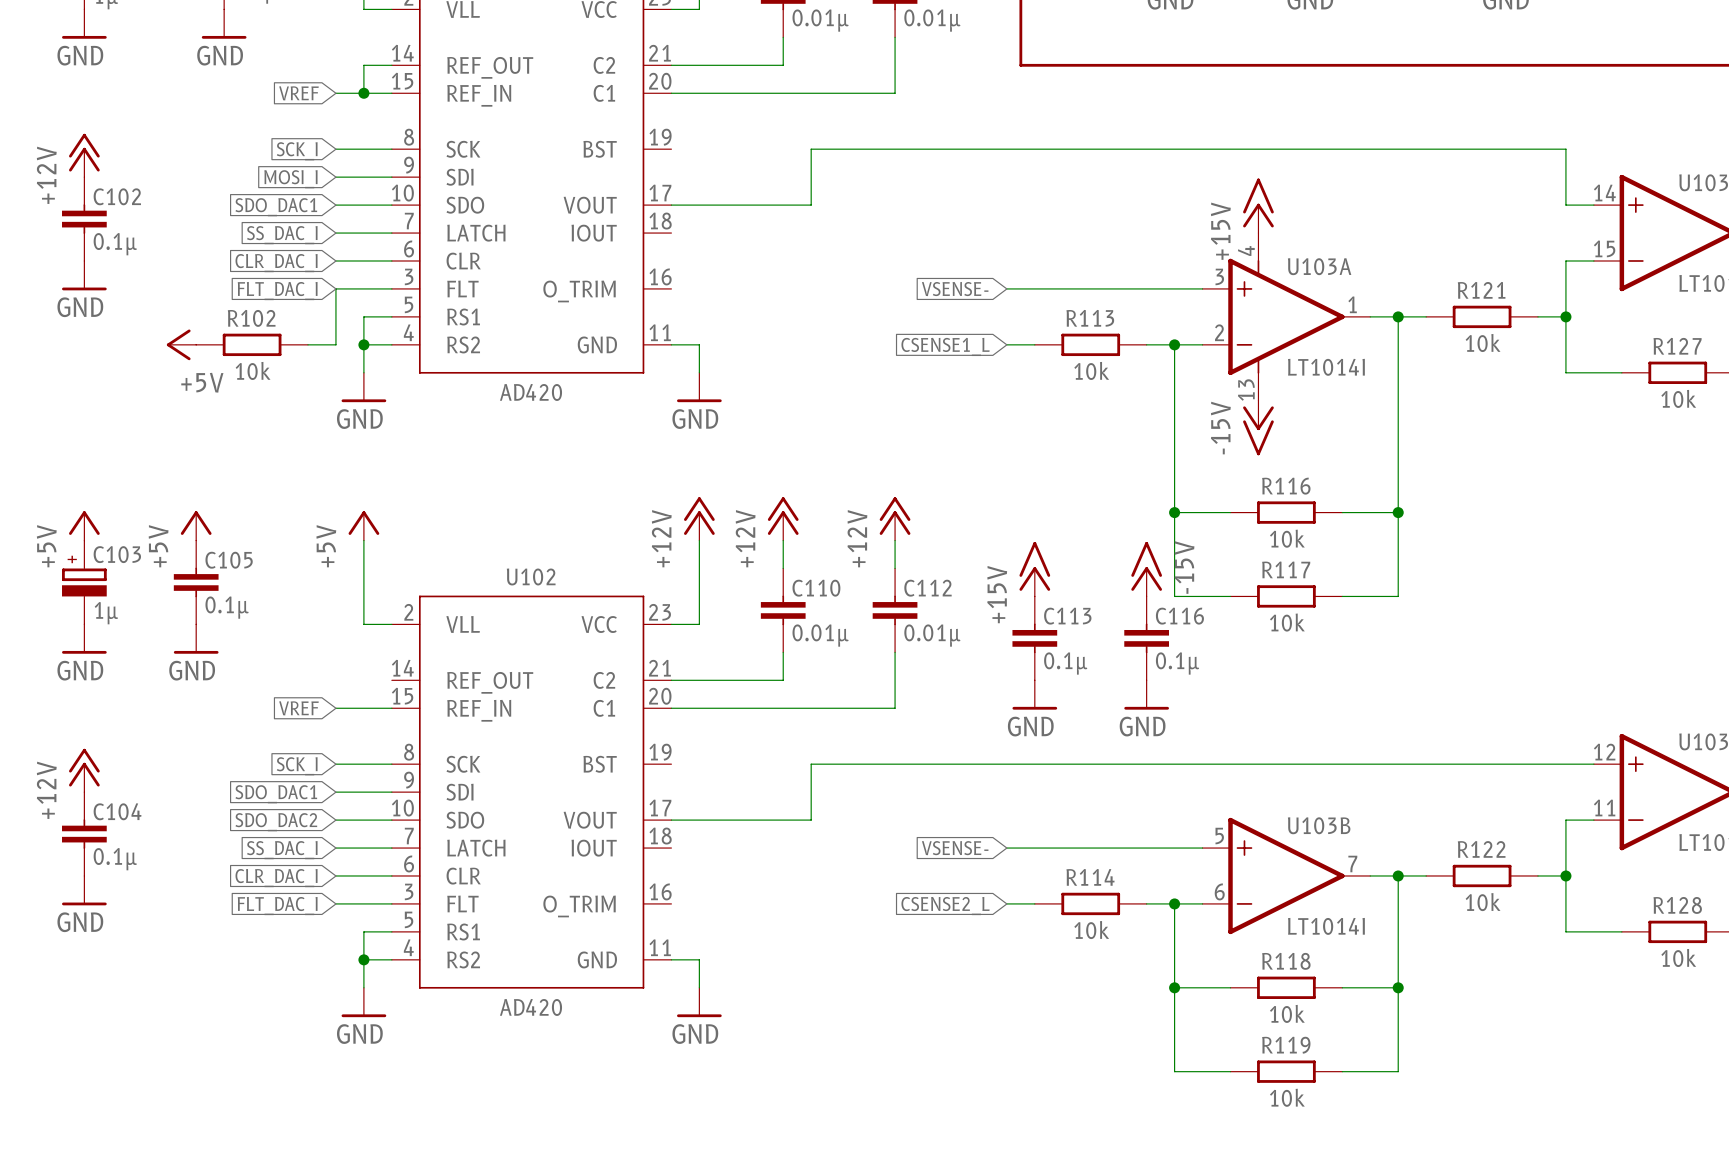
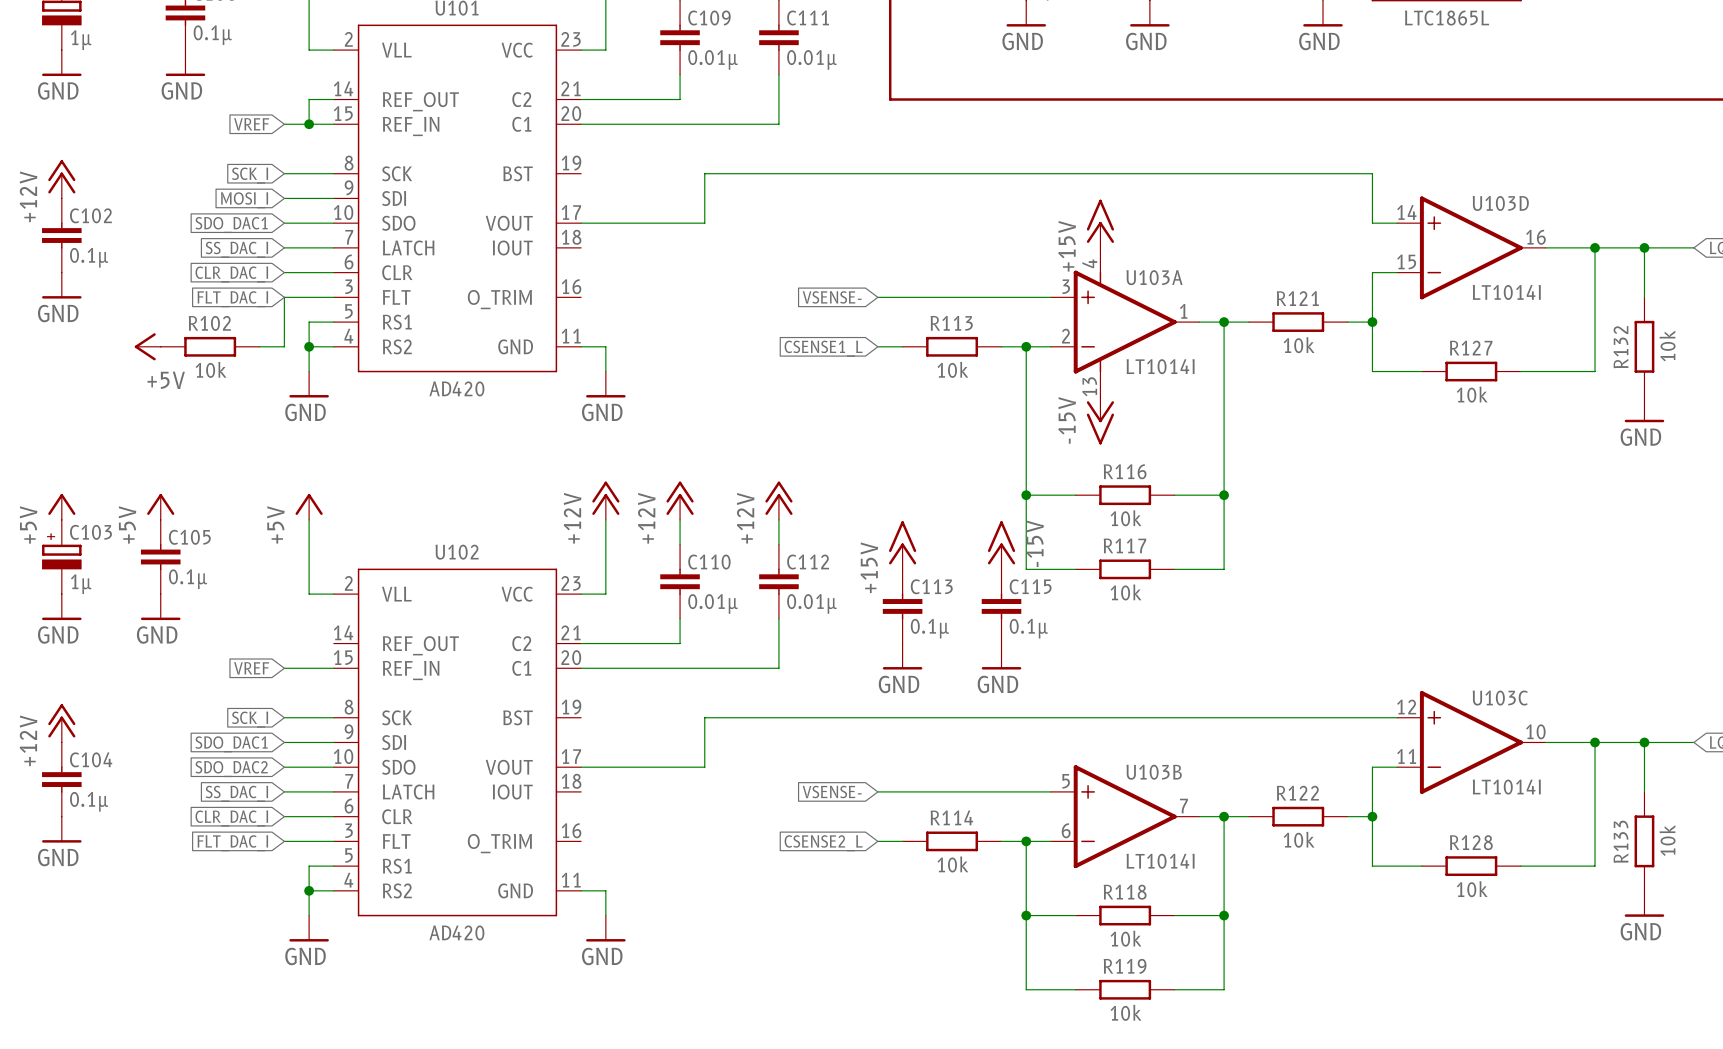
C116 name: C116 (1179, 616) -> C115 (1030, 586)

